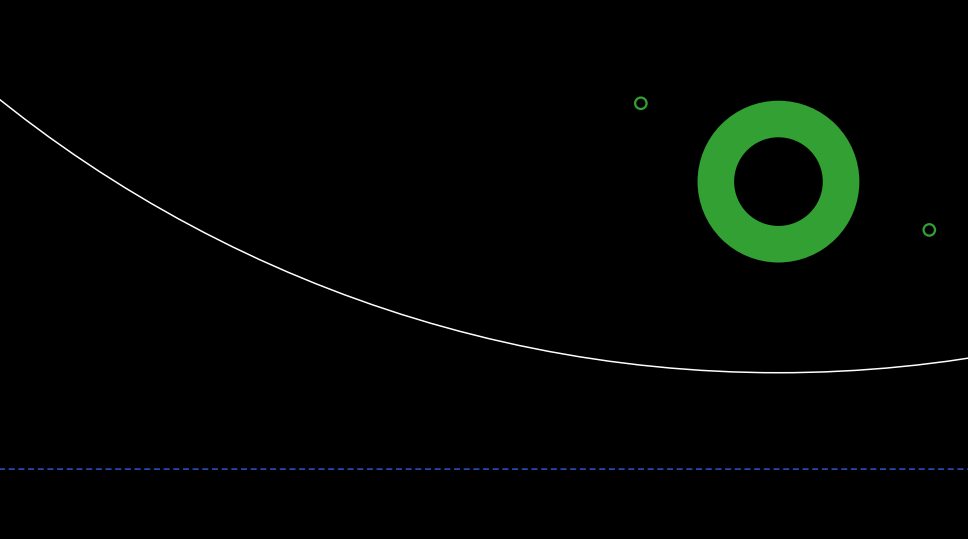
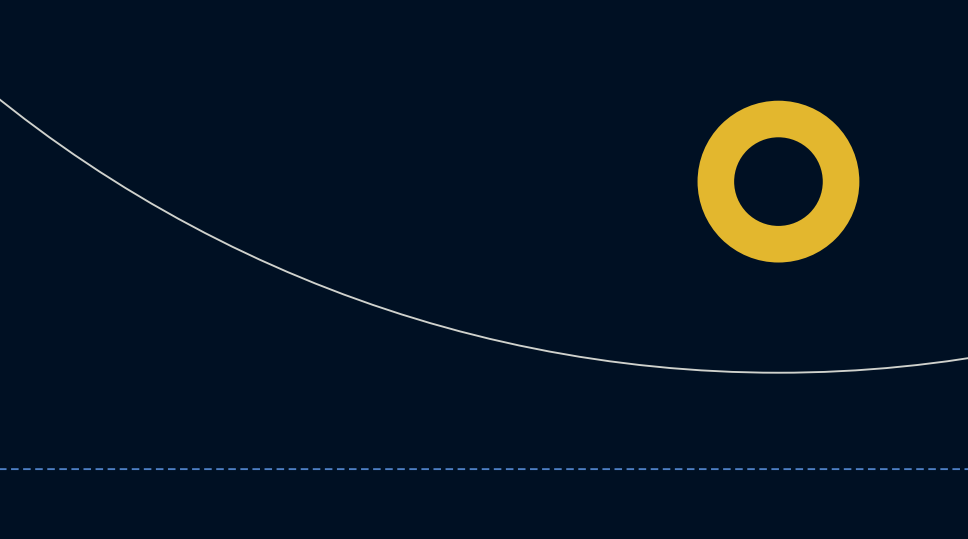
via: (640, 103) -> none
via: (929, 229) -> none

